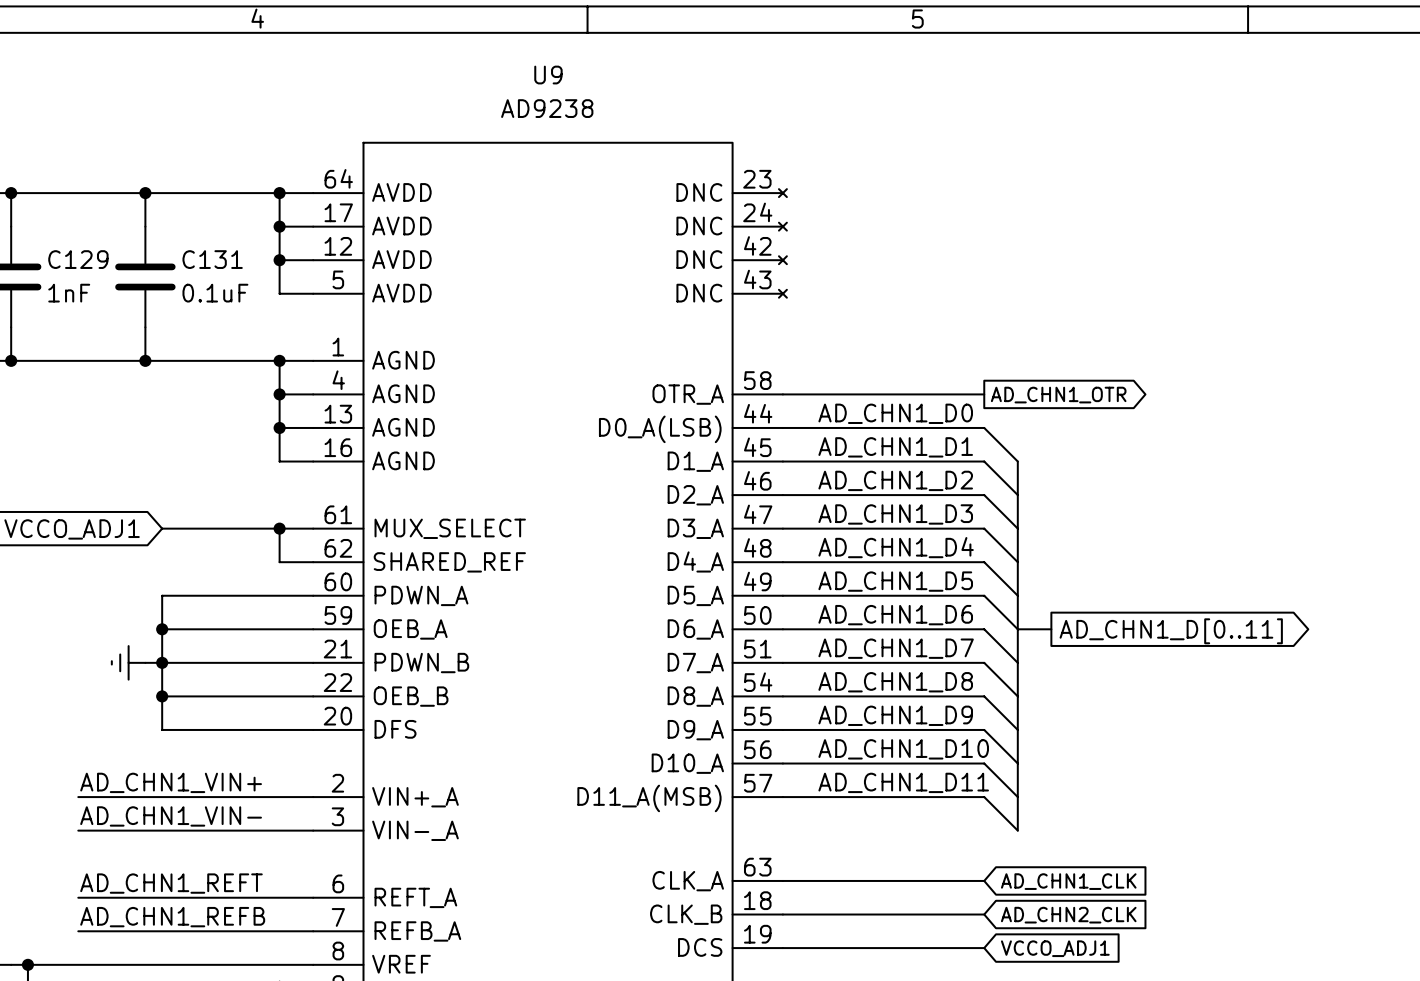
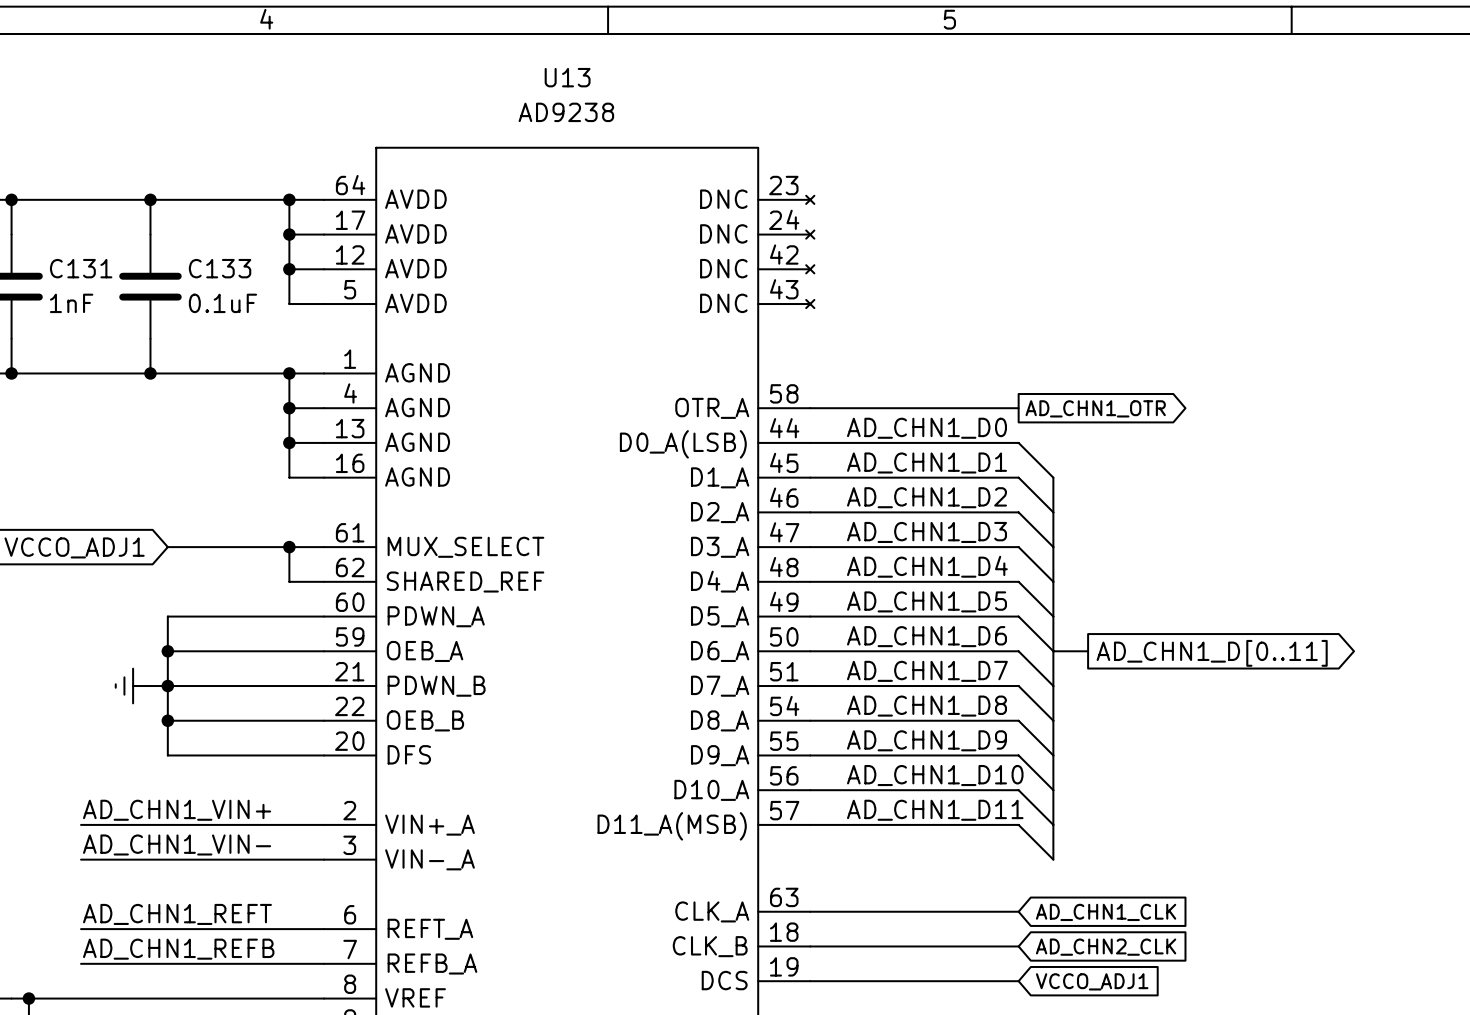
U9 name: U9 (548, 75) -> U13 (567, 77)
C129 name: C129 (78, 259) -> C131 (81, 268)
C131 name: C131 (212, 259) -> C133 (220, 268)

